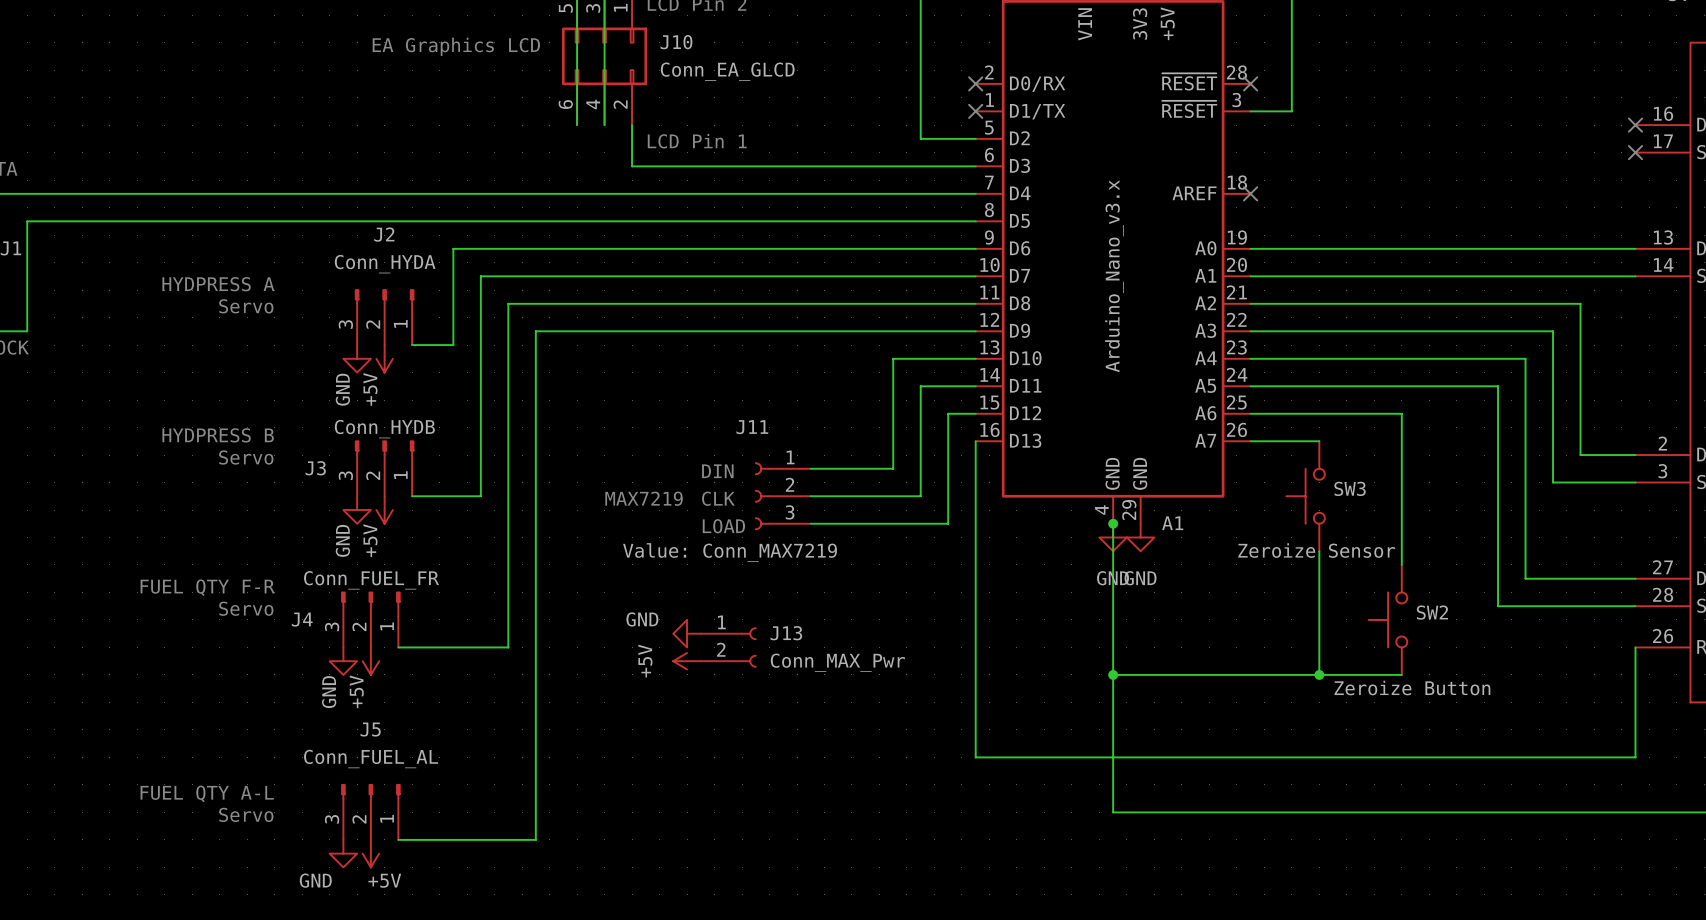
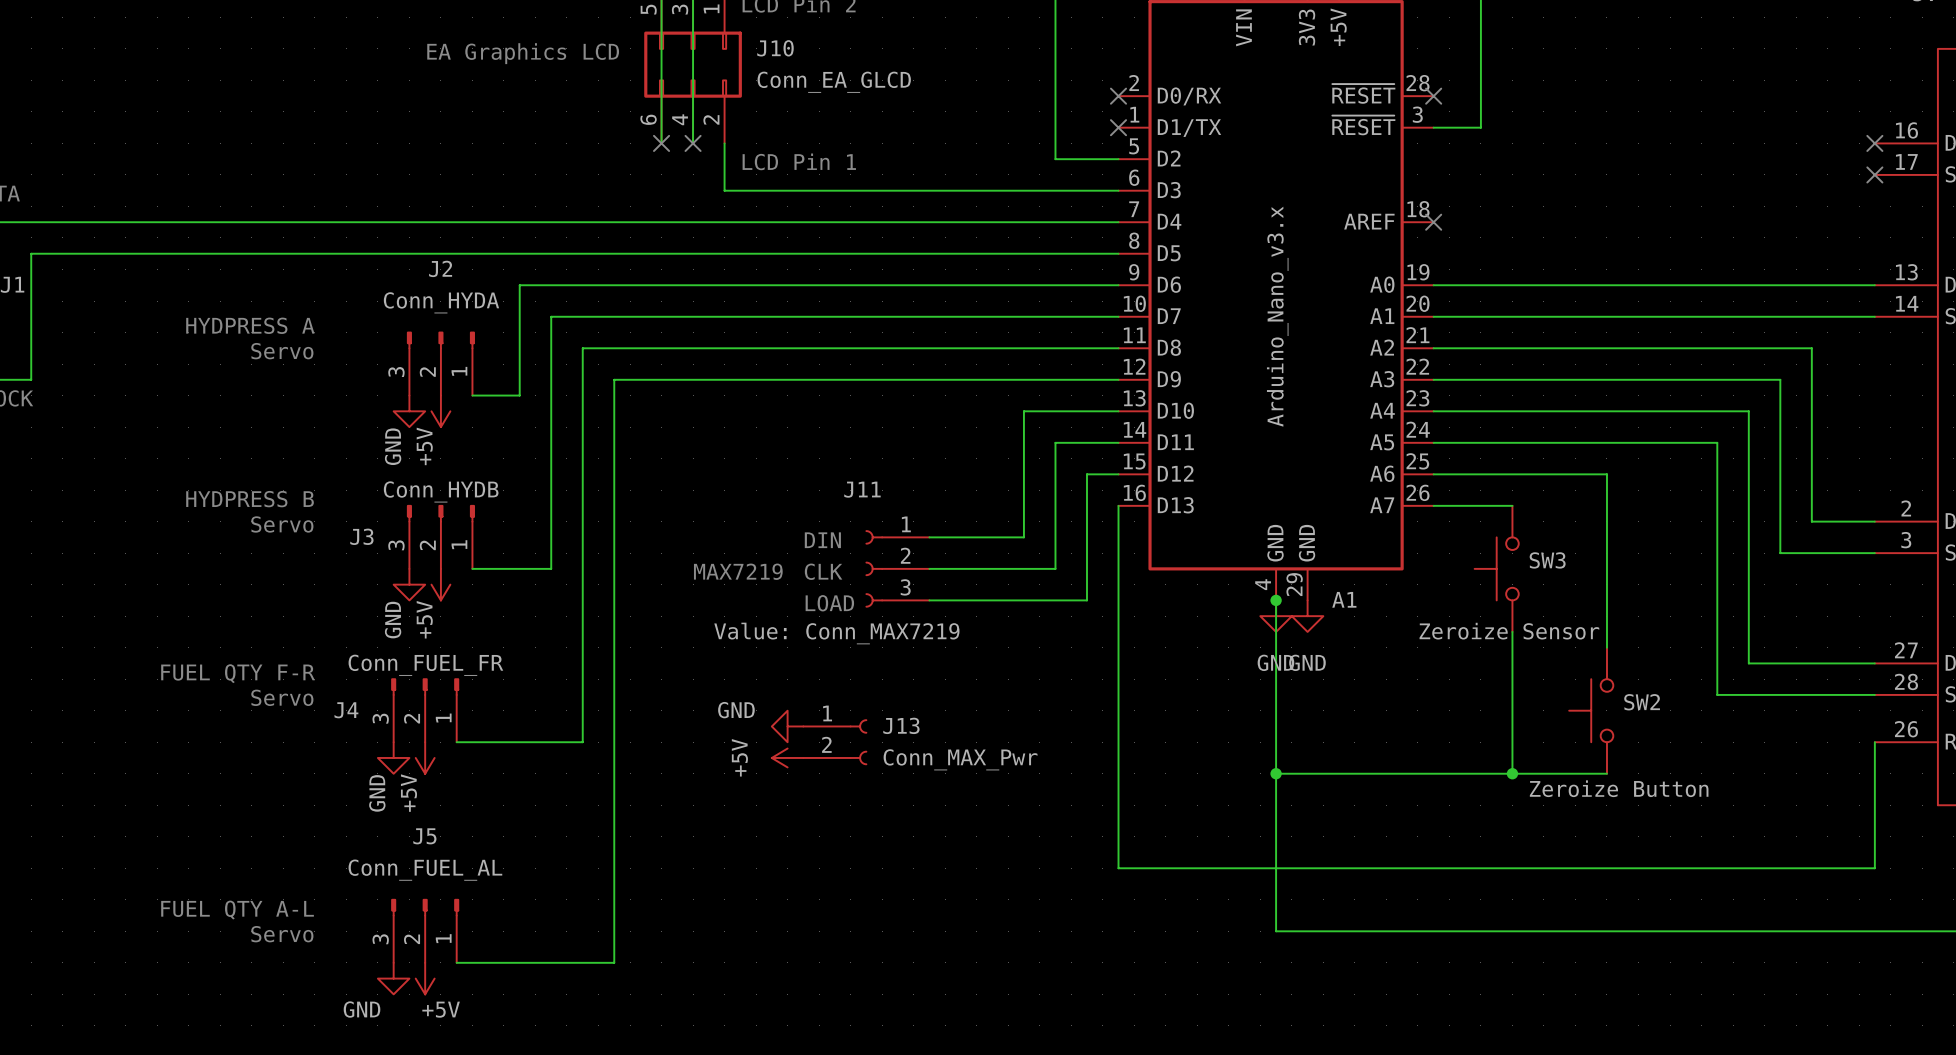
no-connect mark: none -> (661, 143)
no-connect mark: none -> (693, 143)

